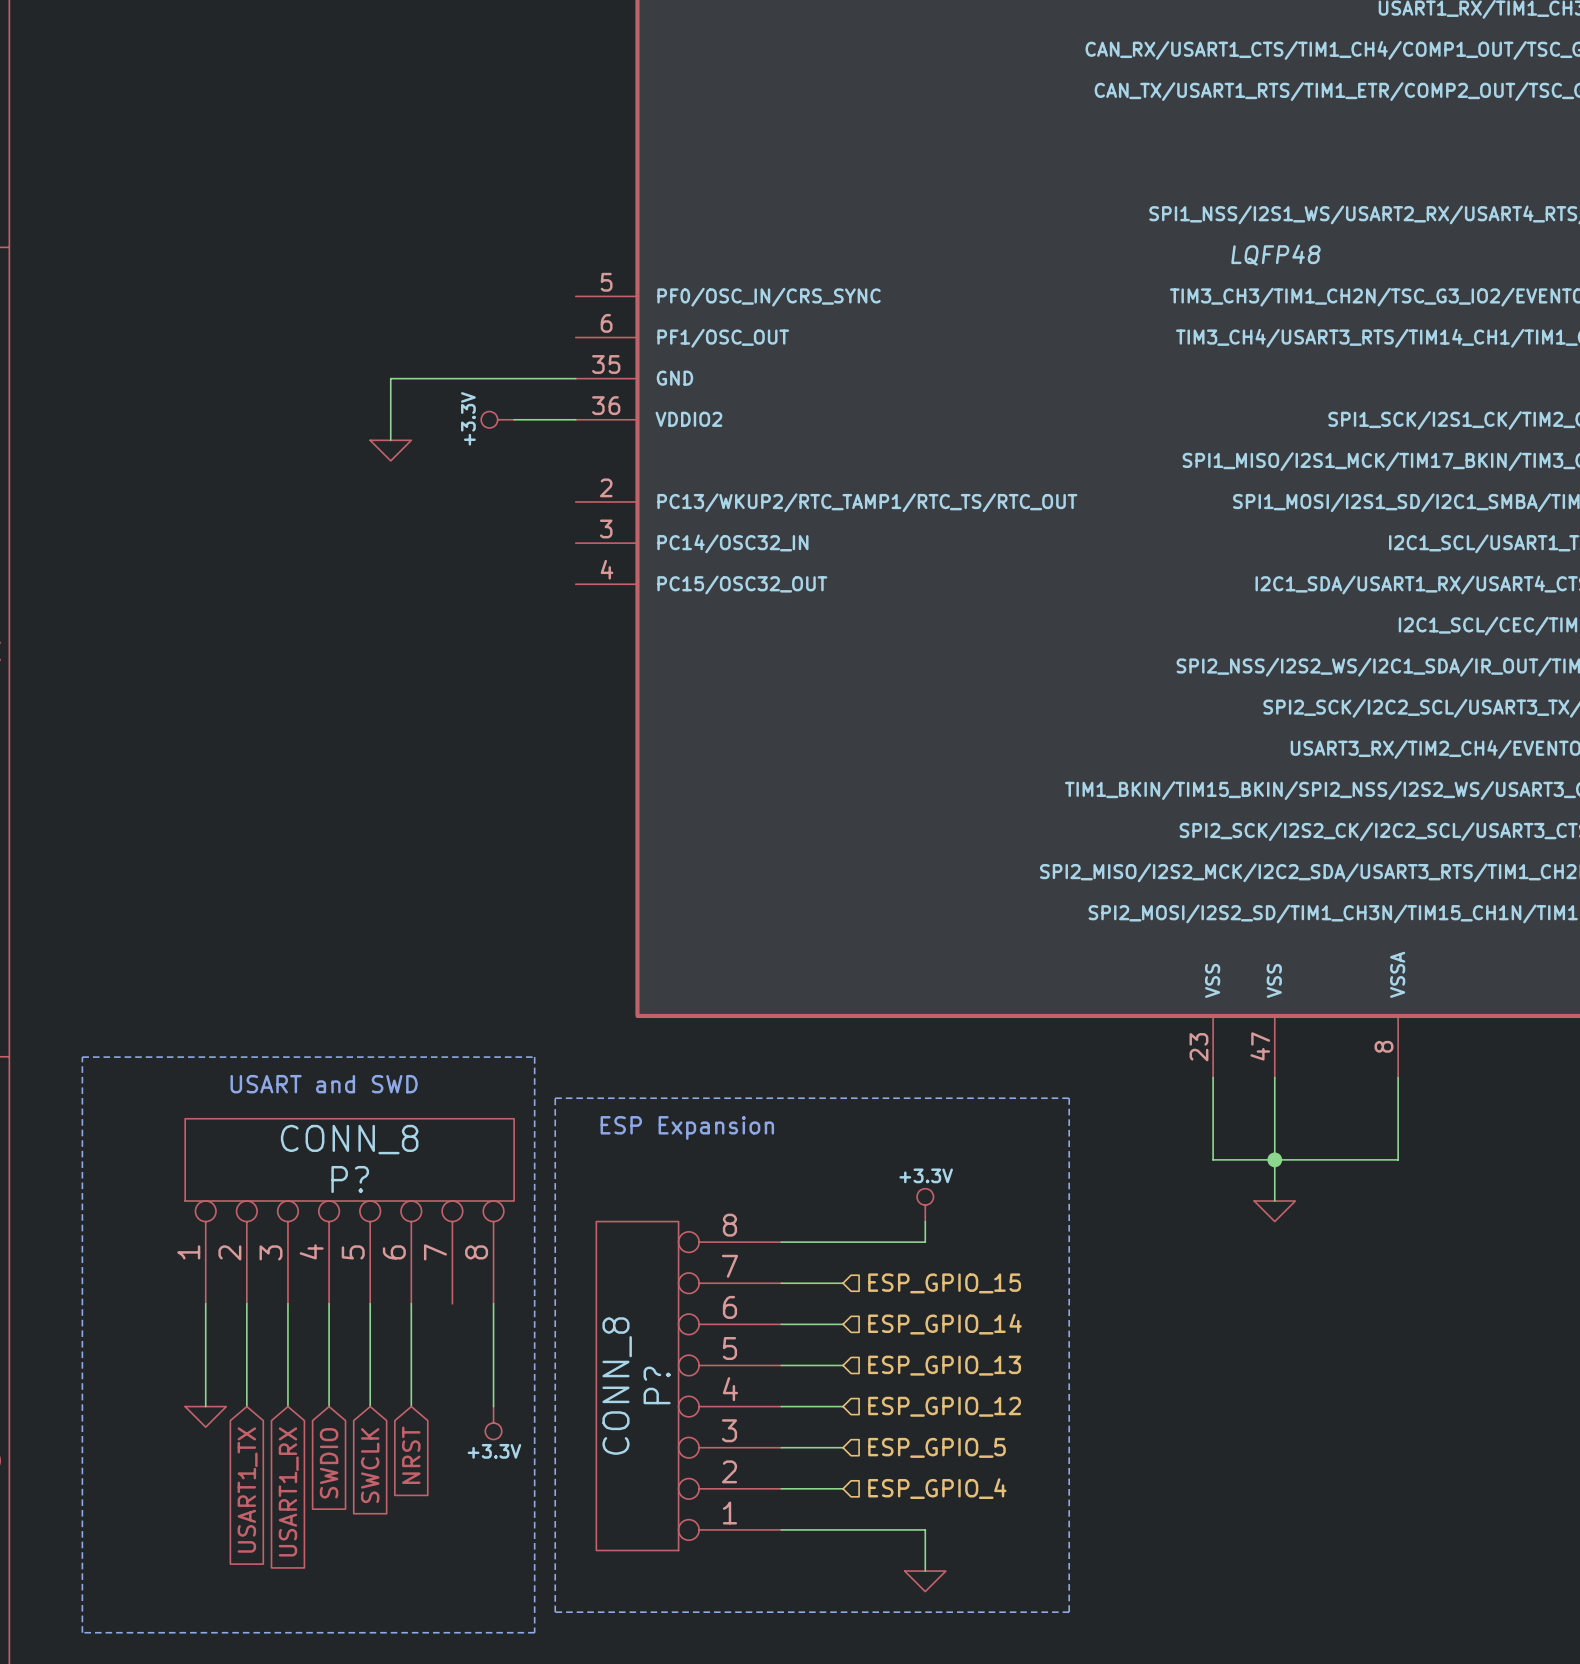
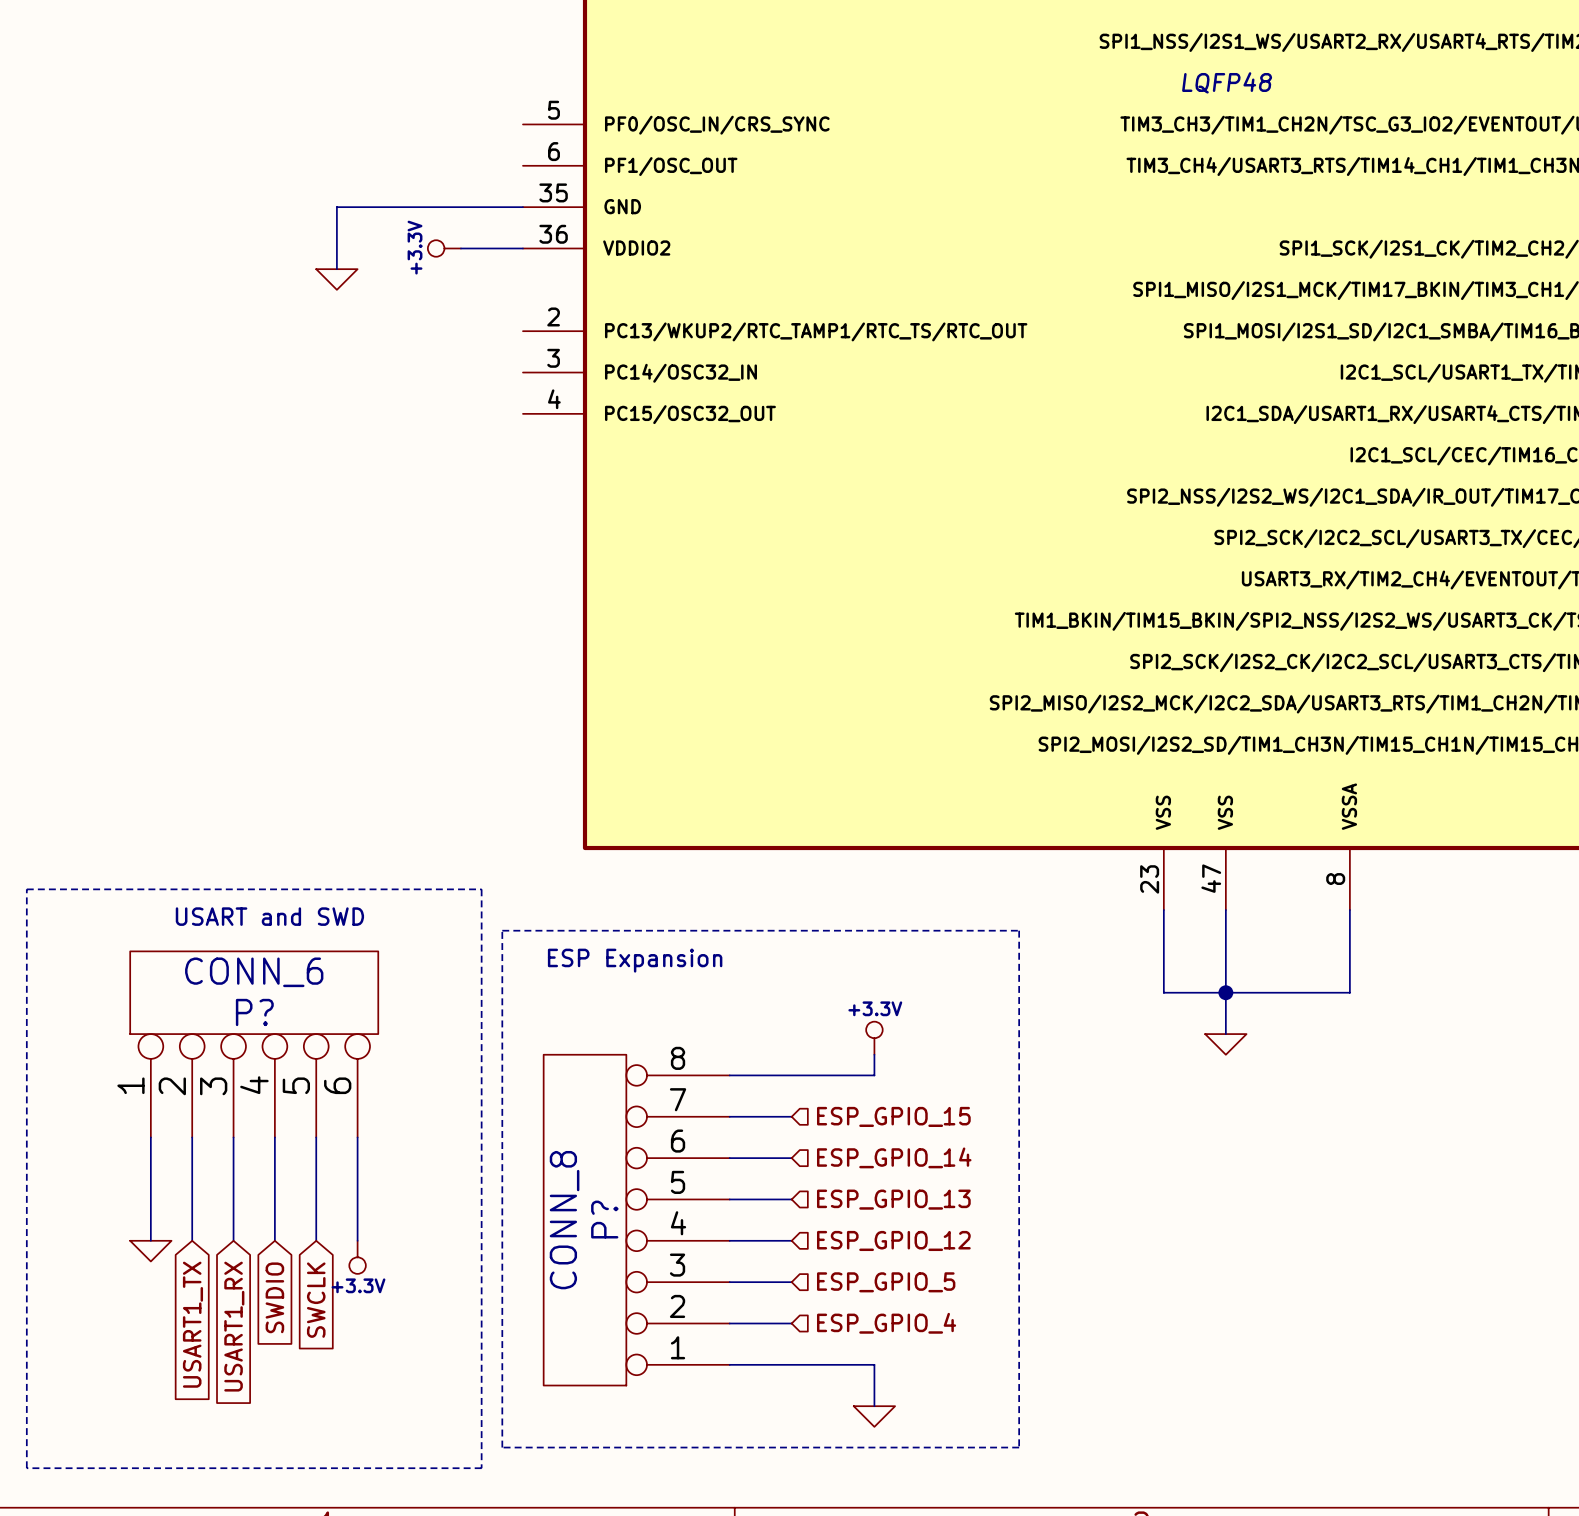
P?: none -> CONN_6 (254, 1044)
P?: CONN_8 (349, 1211) -> none
wire: (493, 1303) (493, 1406) -> none
power symbol position: +3.3V (493, 1423) -> +3.3V (357, 1257)
global label: NRST (411, 1455) -> none

